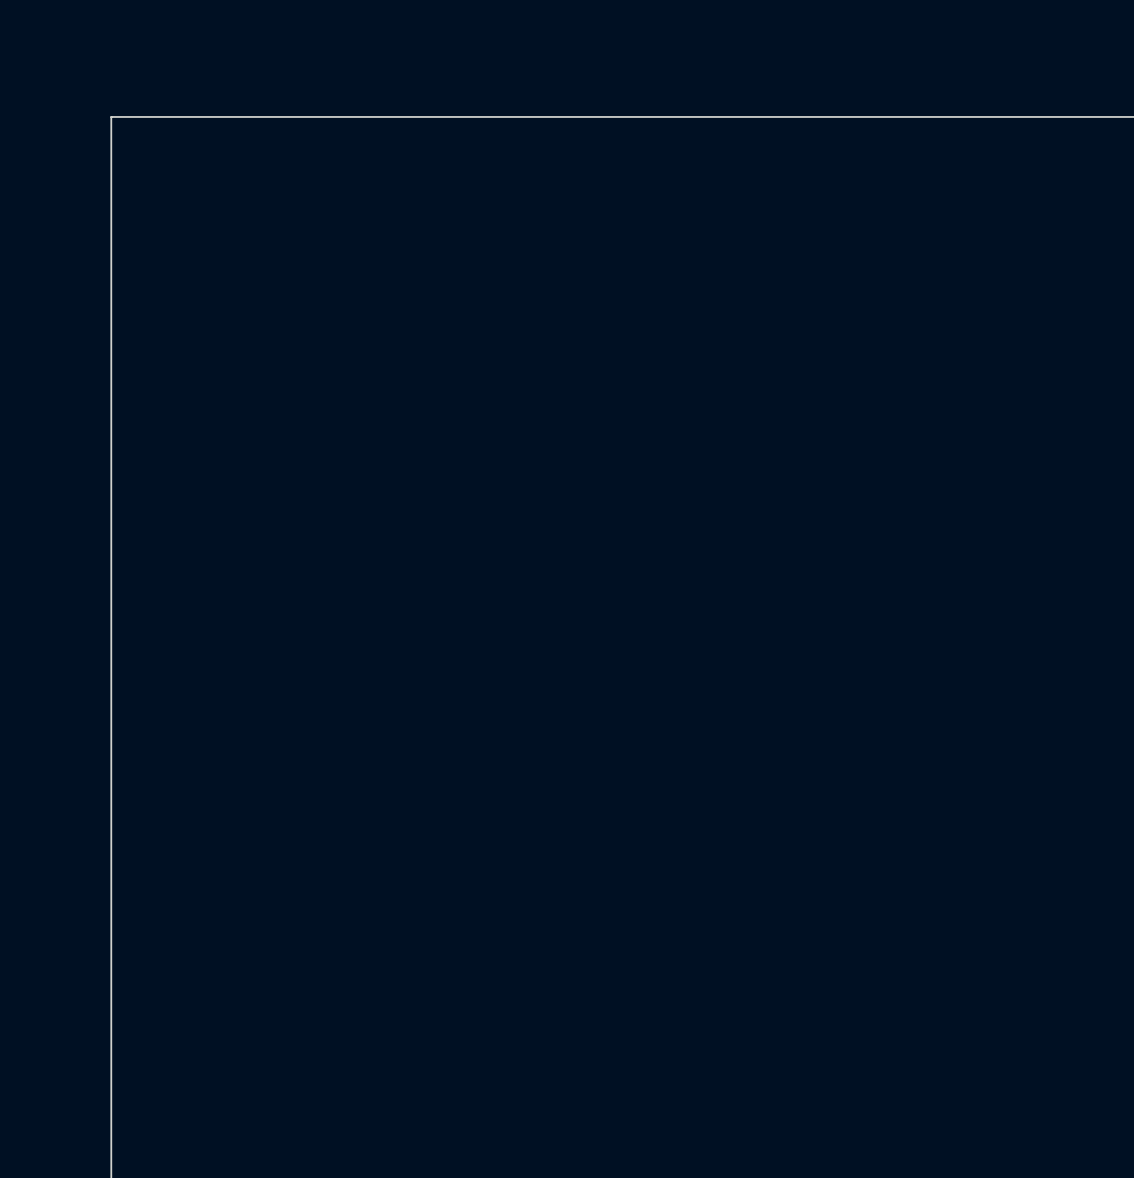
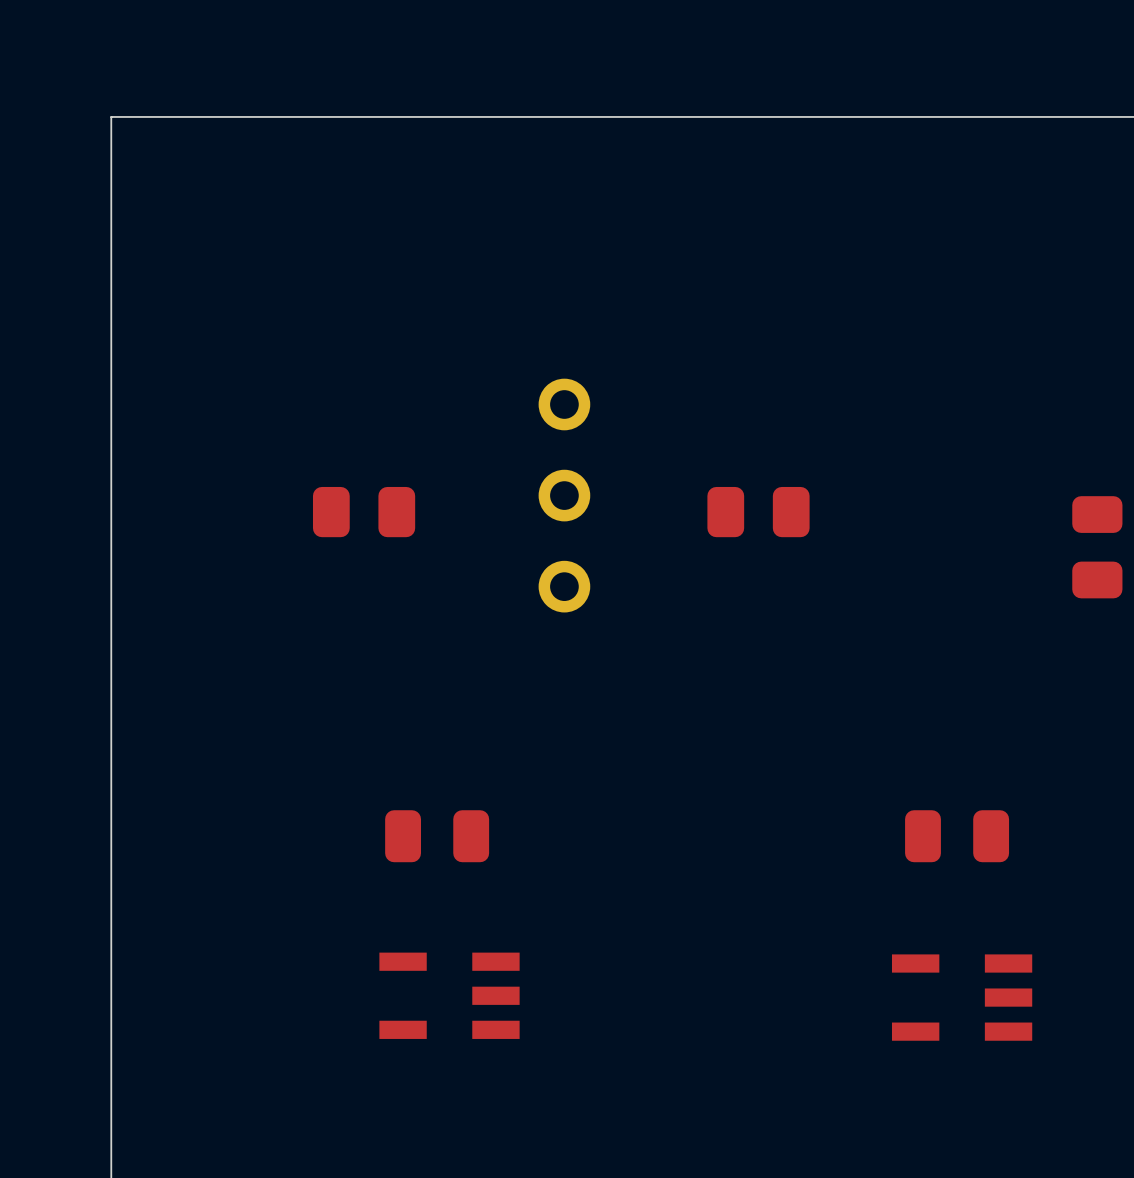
part: none -> (564, 495)
part: none -> (364, 512)
part: none -> (758, 512)
part: none -> (1097, 547)
part: none -> (437, 836)
part: none -> (957, 836)
part: none -> (449, 995)
part: none -> (962, 997)

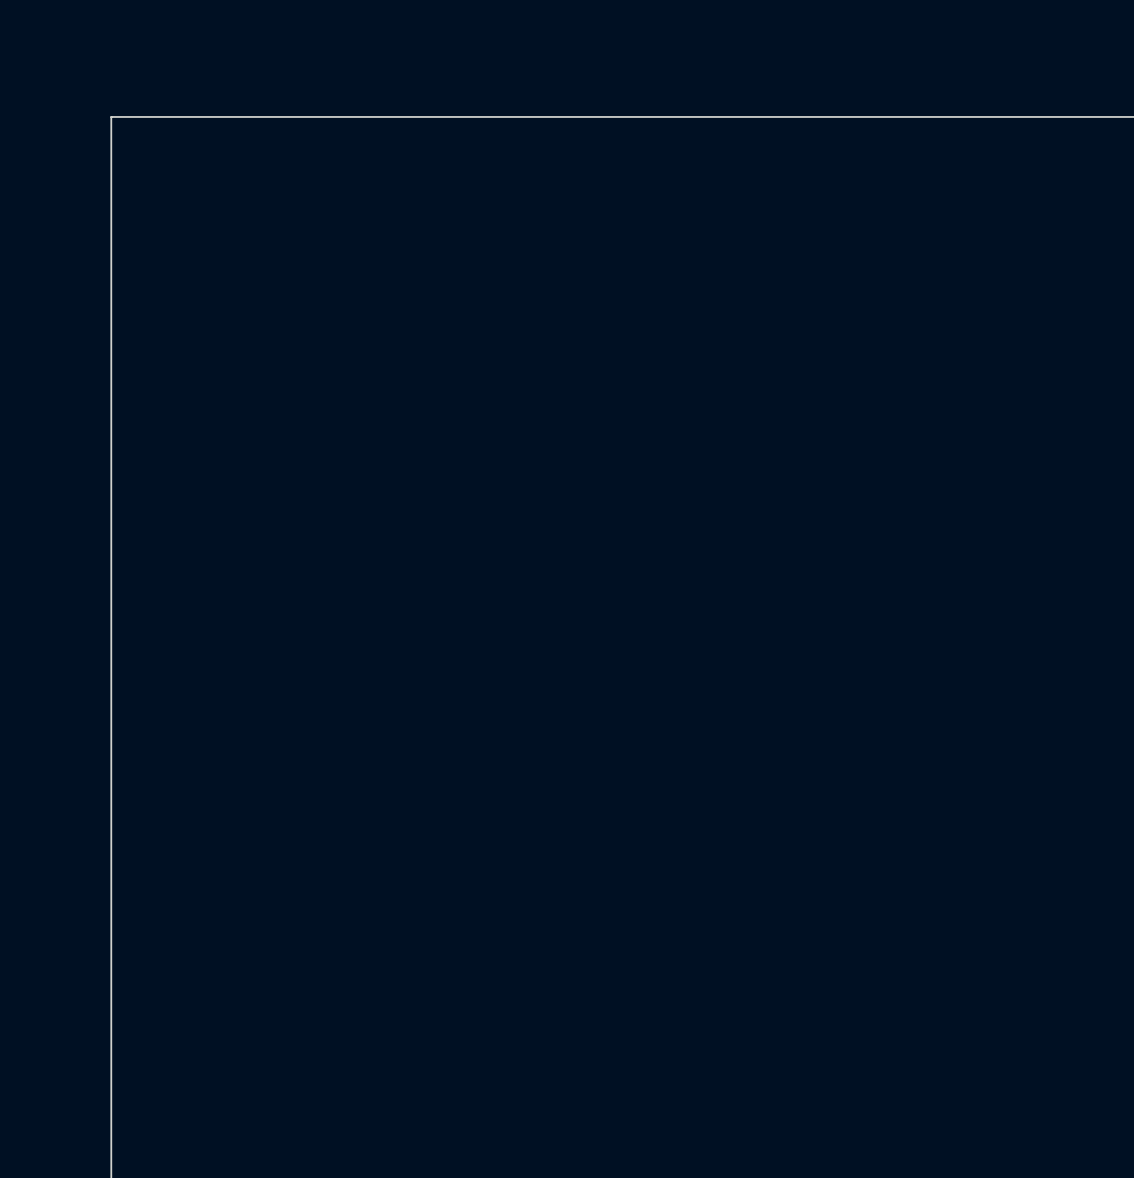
part: (564, 495) -> none
part: (364, 512) -> none
part: (758, 512) -> none
part: (1097, 547) -> none
part: (437, 836) -> none
part: (957, 836) -> none
part: (449, 995) -> none
part: (962, 997) -> none

